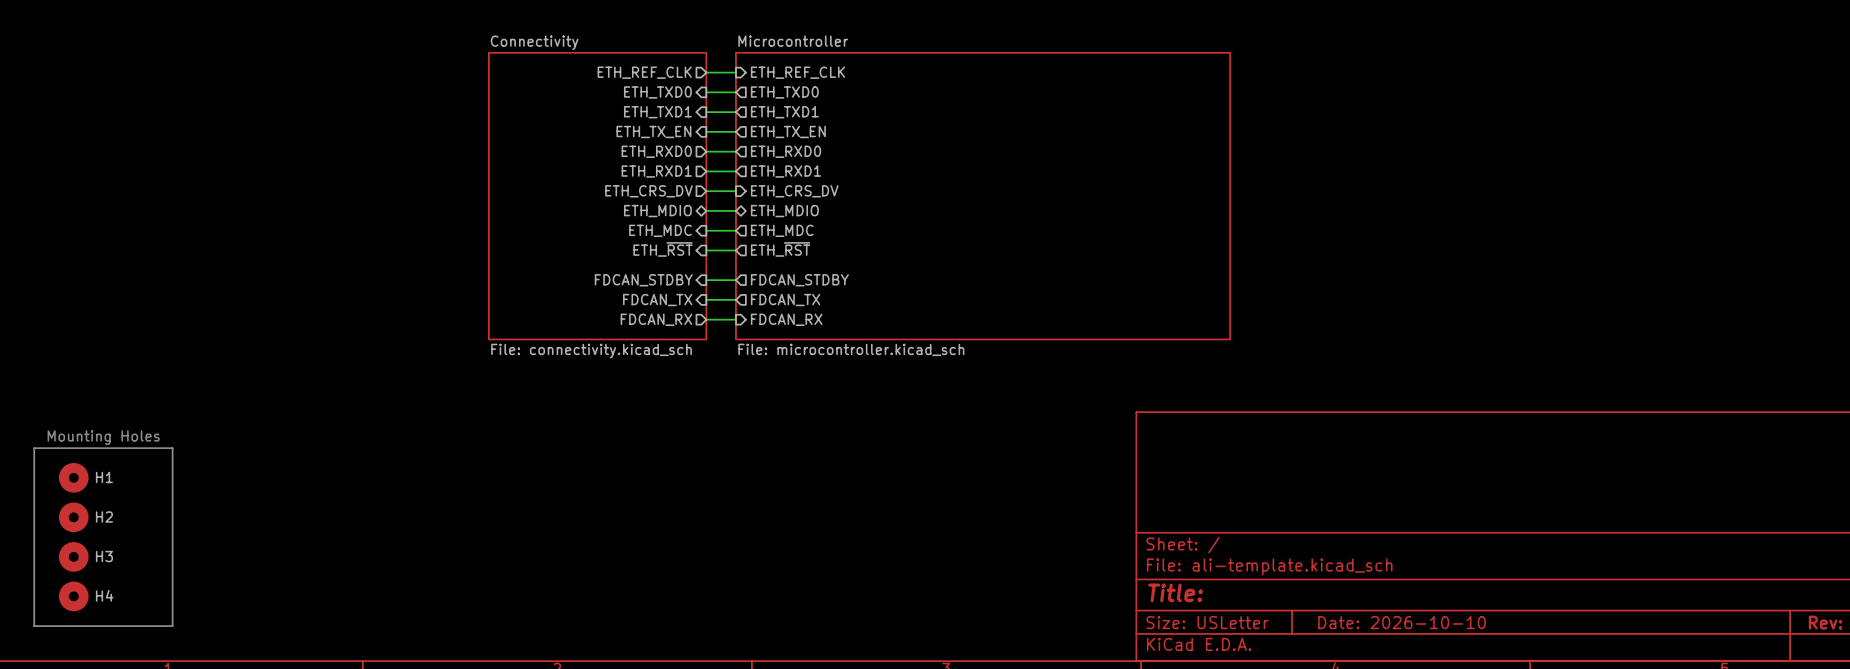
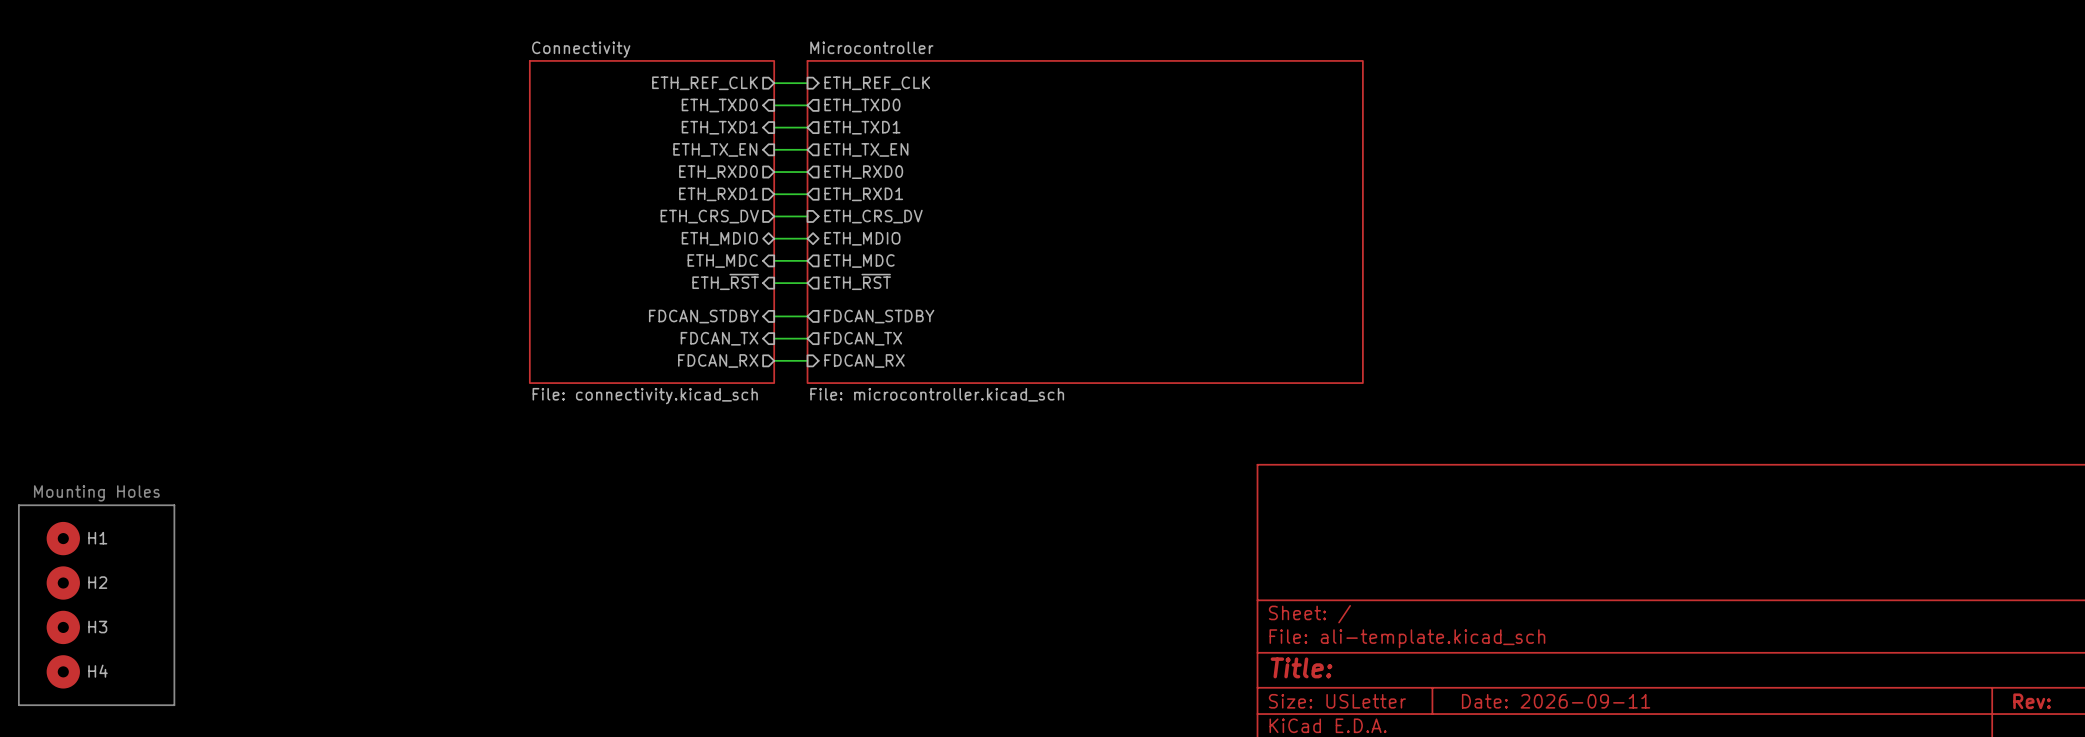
title block: Date: 2026-10-10 (1402, 622) -> Date: 2026-09-11 (1556, 701)

